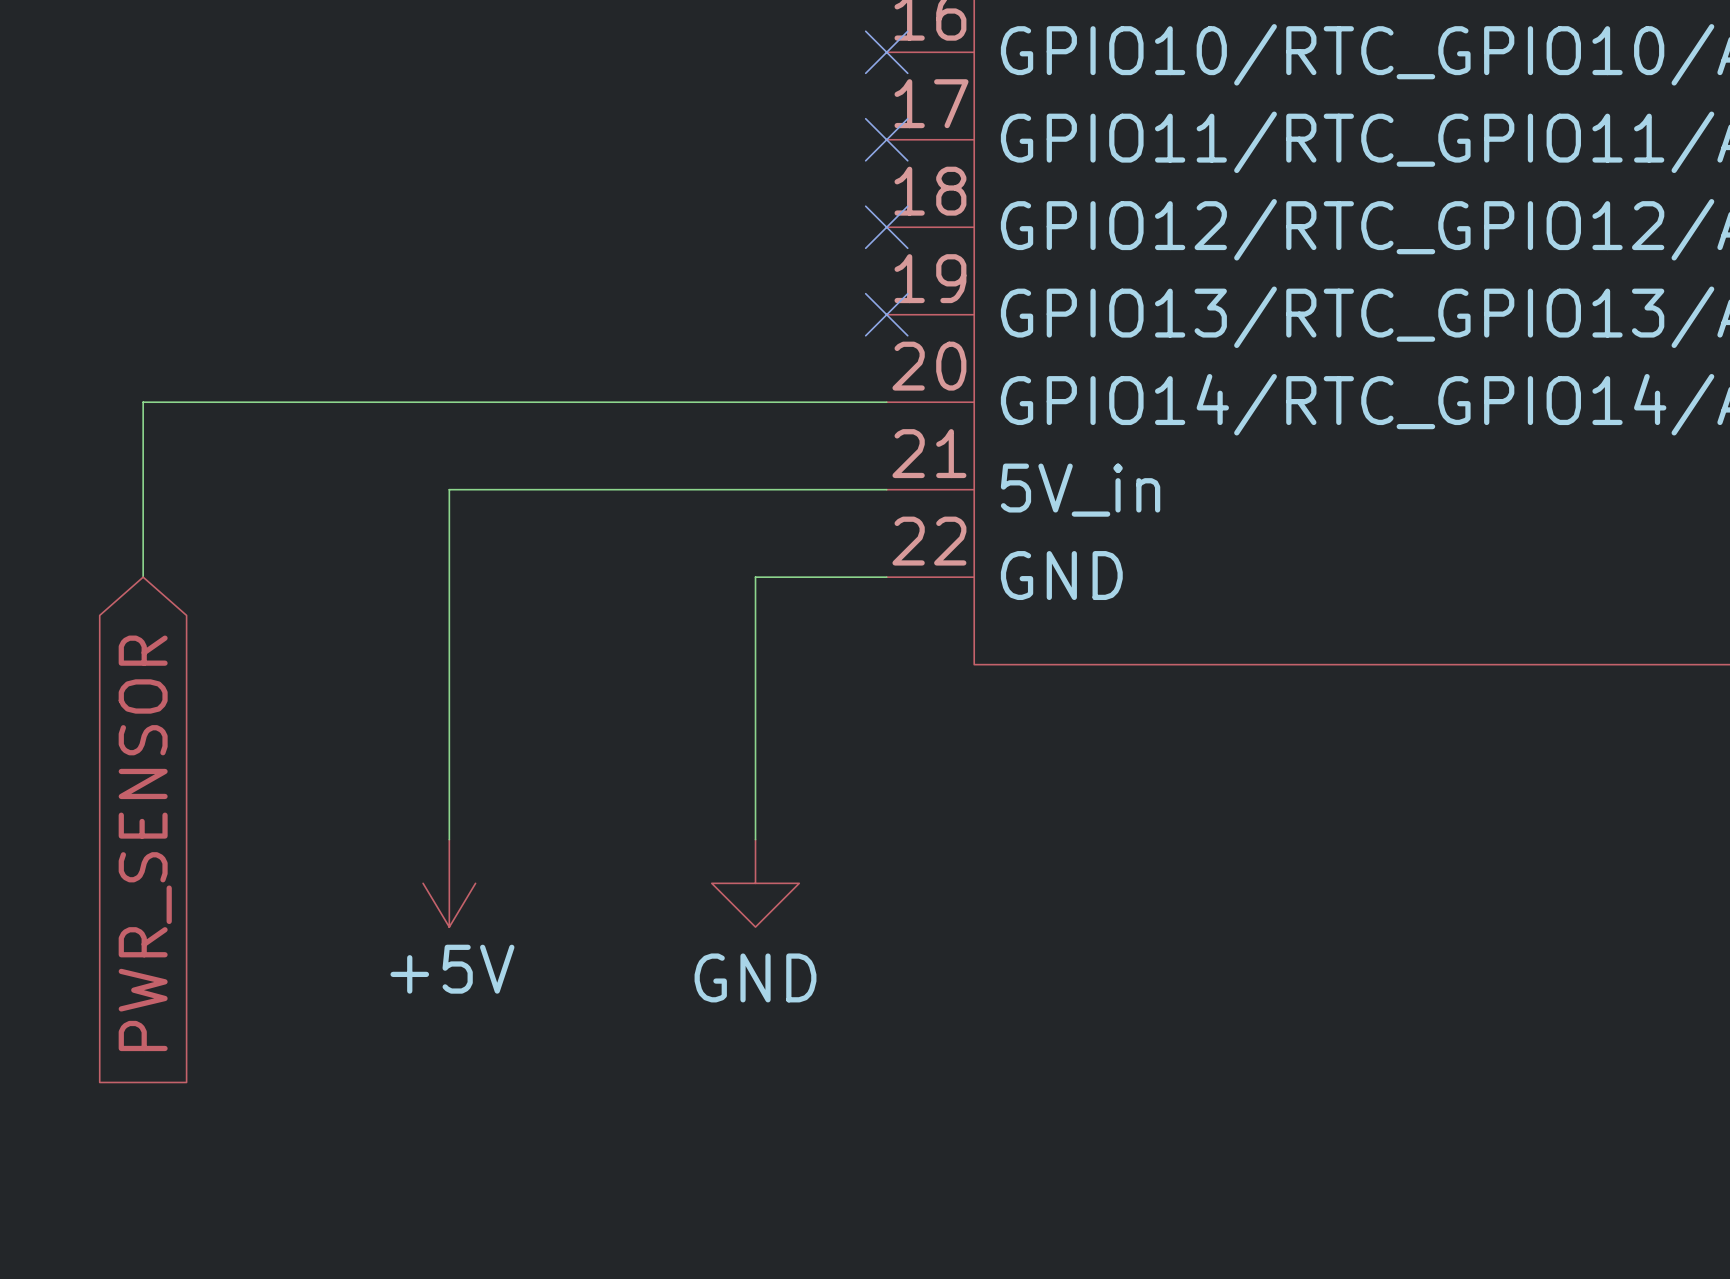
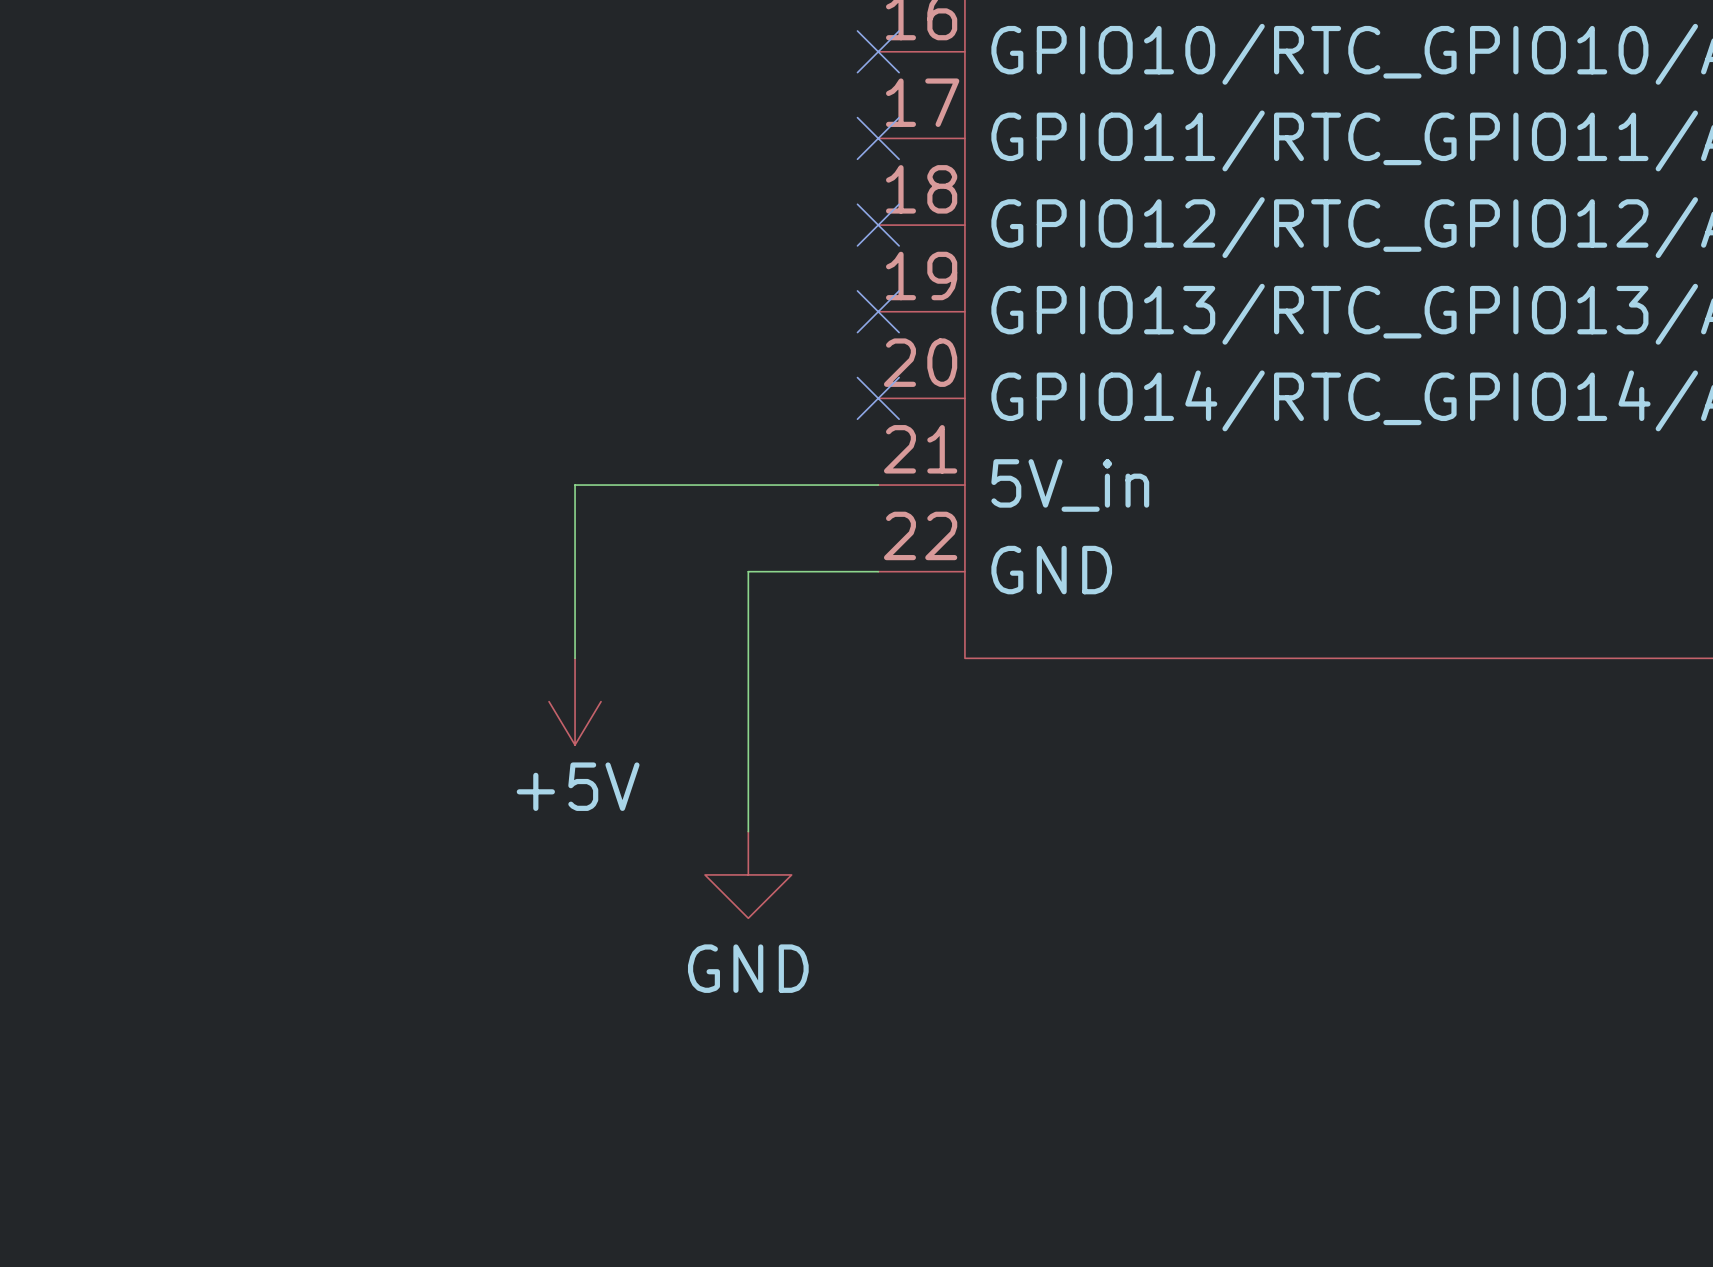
wire: (886, 402) (143, 402) (143, 577) -> none
no-connect mark: none -> (878, 398)
wire: (580, 489) (449, 489) (449, 839) -> (575, 485) (575, 658)
global label: PWR_SENSOR (145, 843) -> none
power symbol position: +5V (449, 883) -> +5V (575, 701)

